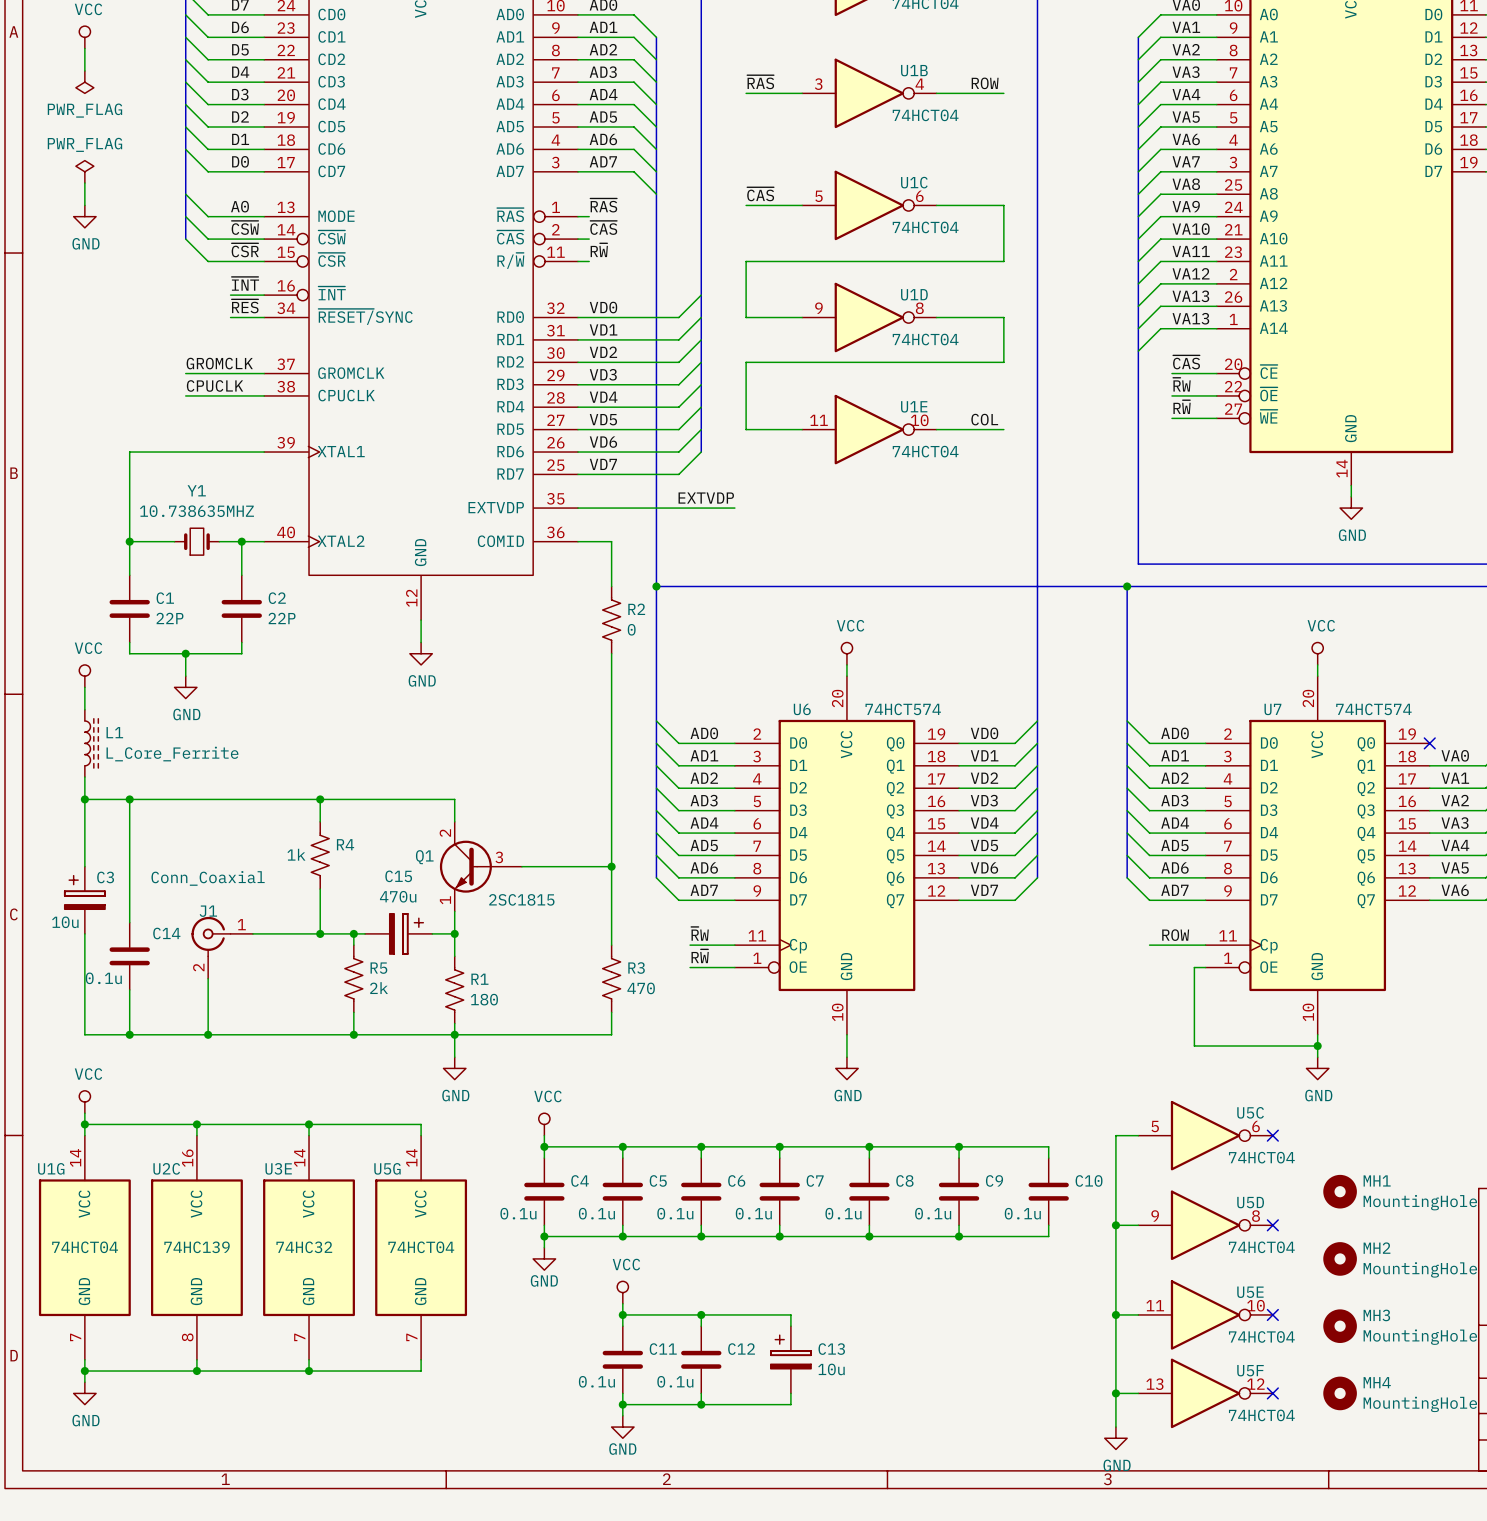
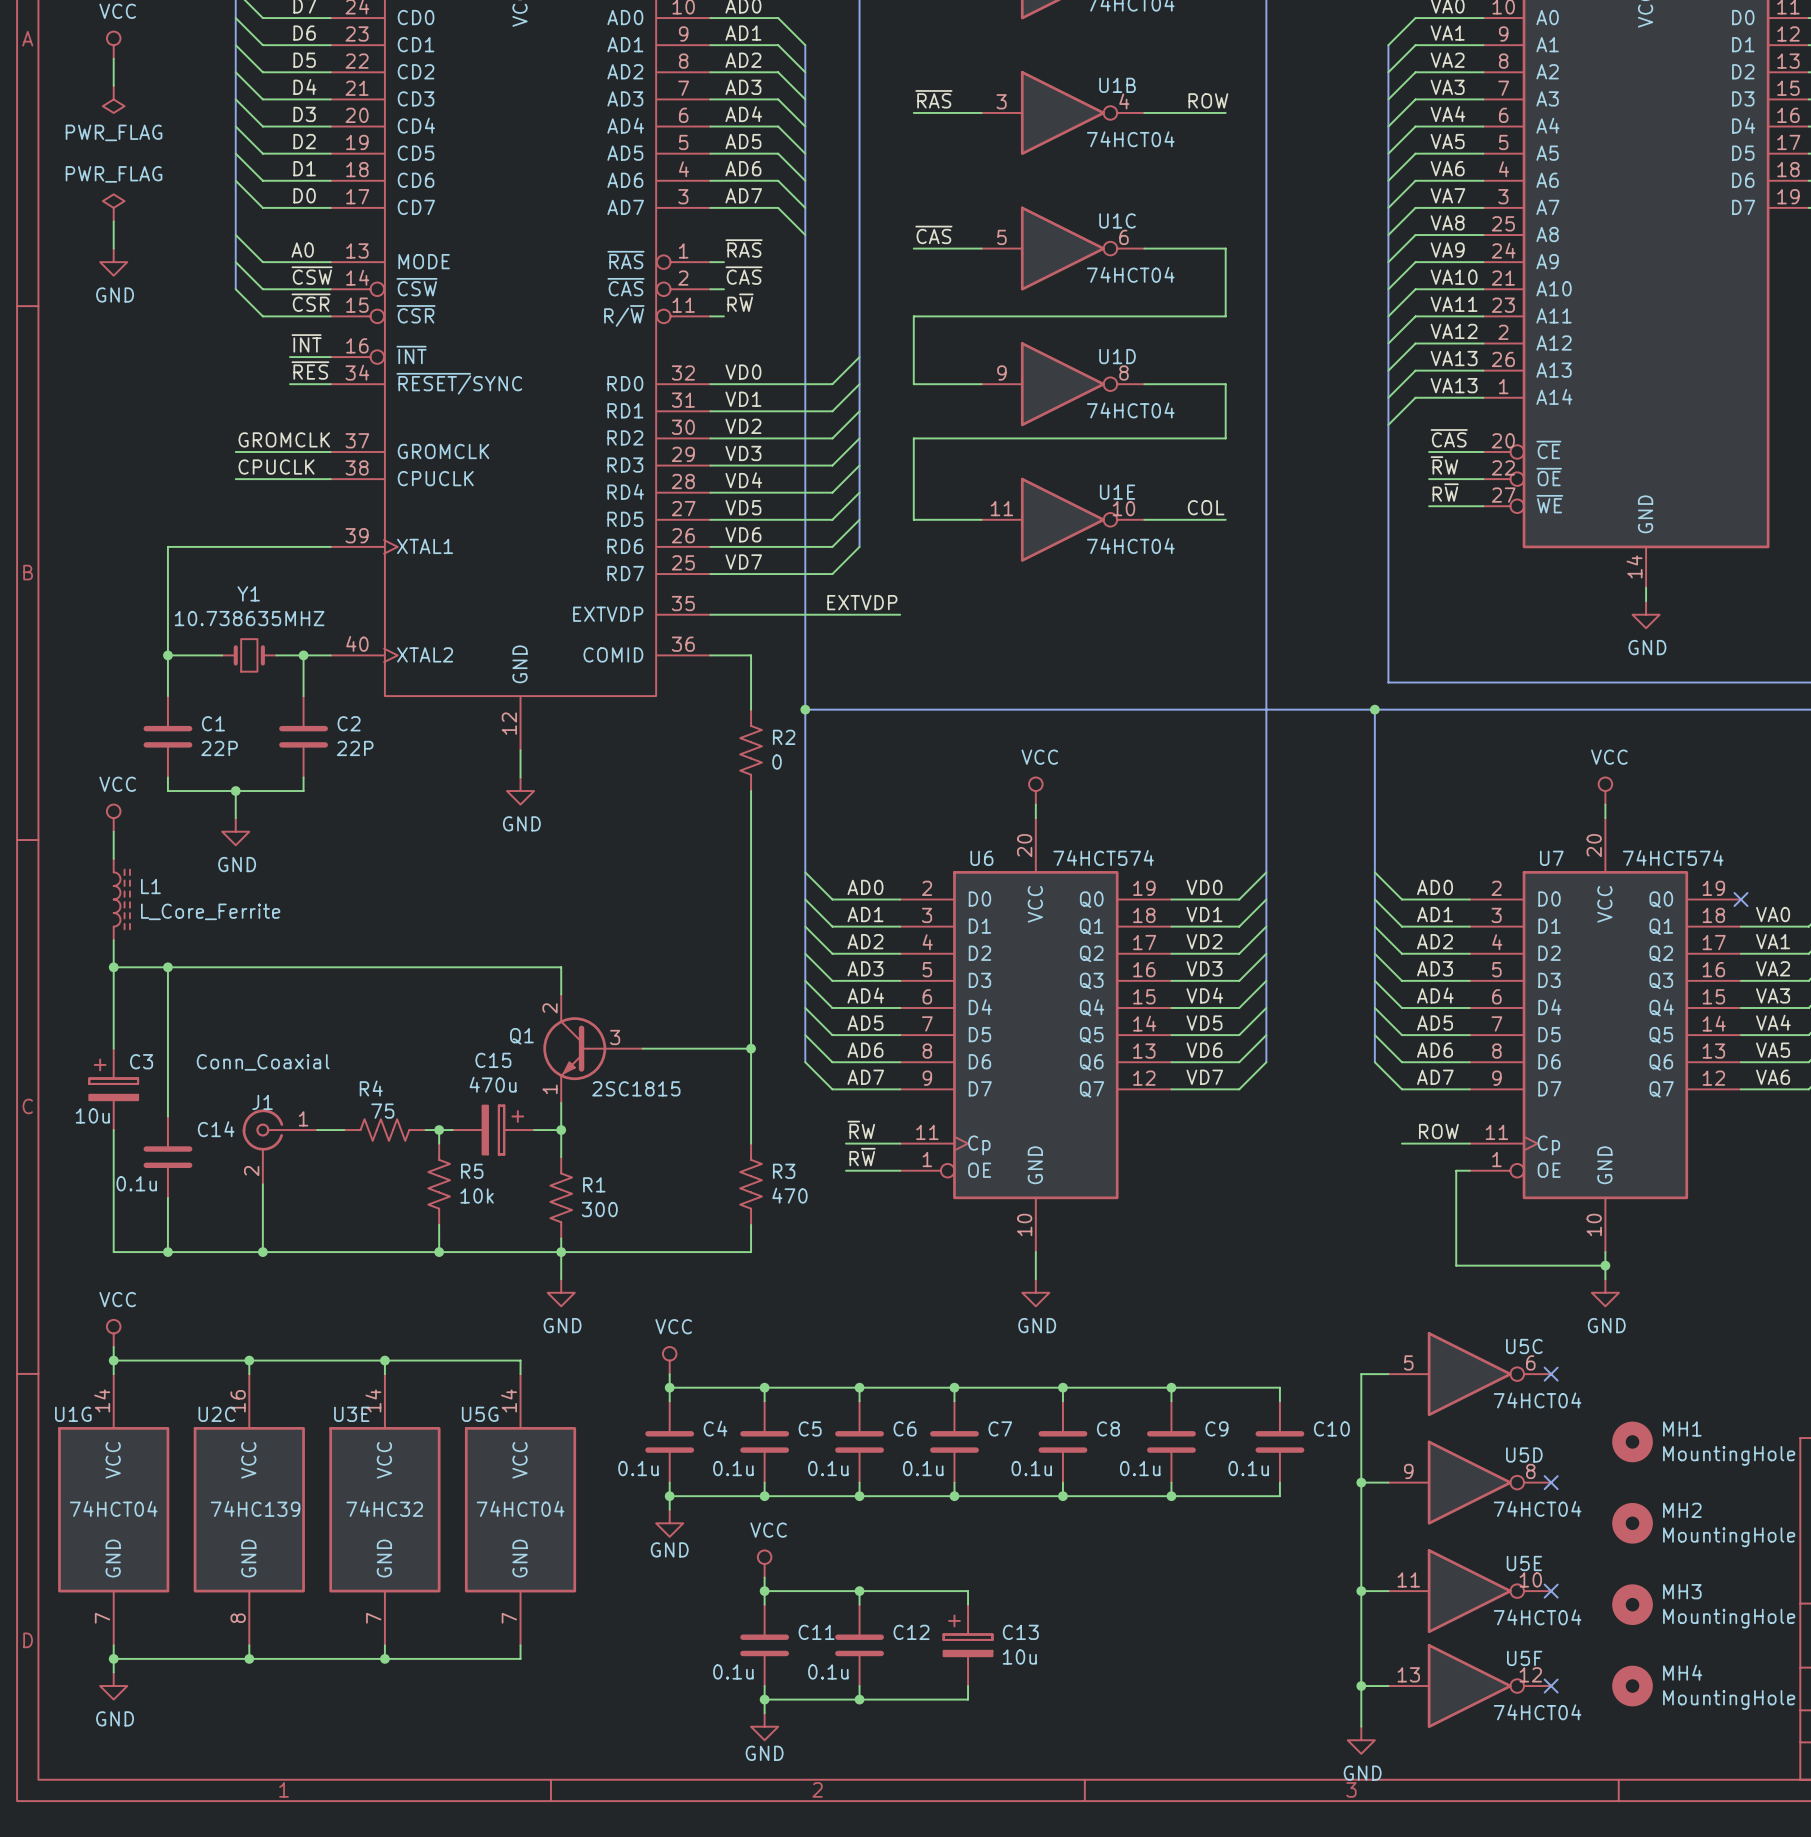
wire: (320, 799) (320, 821) -> none
junction: (320, 799) -> none
R4 name position: R4 (345, 844) -> R4 (371, 1088)
R4 value: 1k (296, 854) -> 75 (382, 1111)
R4 rotation: 0° (320, 855) -> 90° clockwise (384, 1130)
R4 position: (320, 855) -> (384, 1130)
wire: (320, 889) (320, 933) -> none
junction: (320, 933) -> none
R5 value: 2k (379, 988) -> 10k (477, 1195)
R1 value: 180 (484, 999) -> 300 (599, 1209)

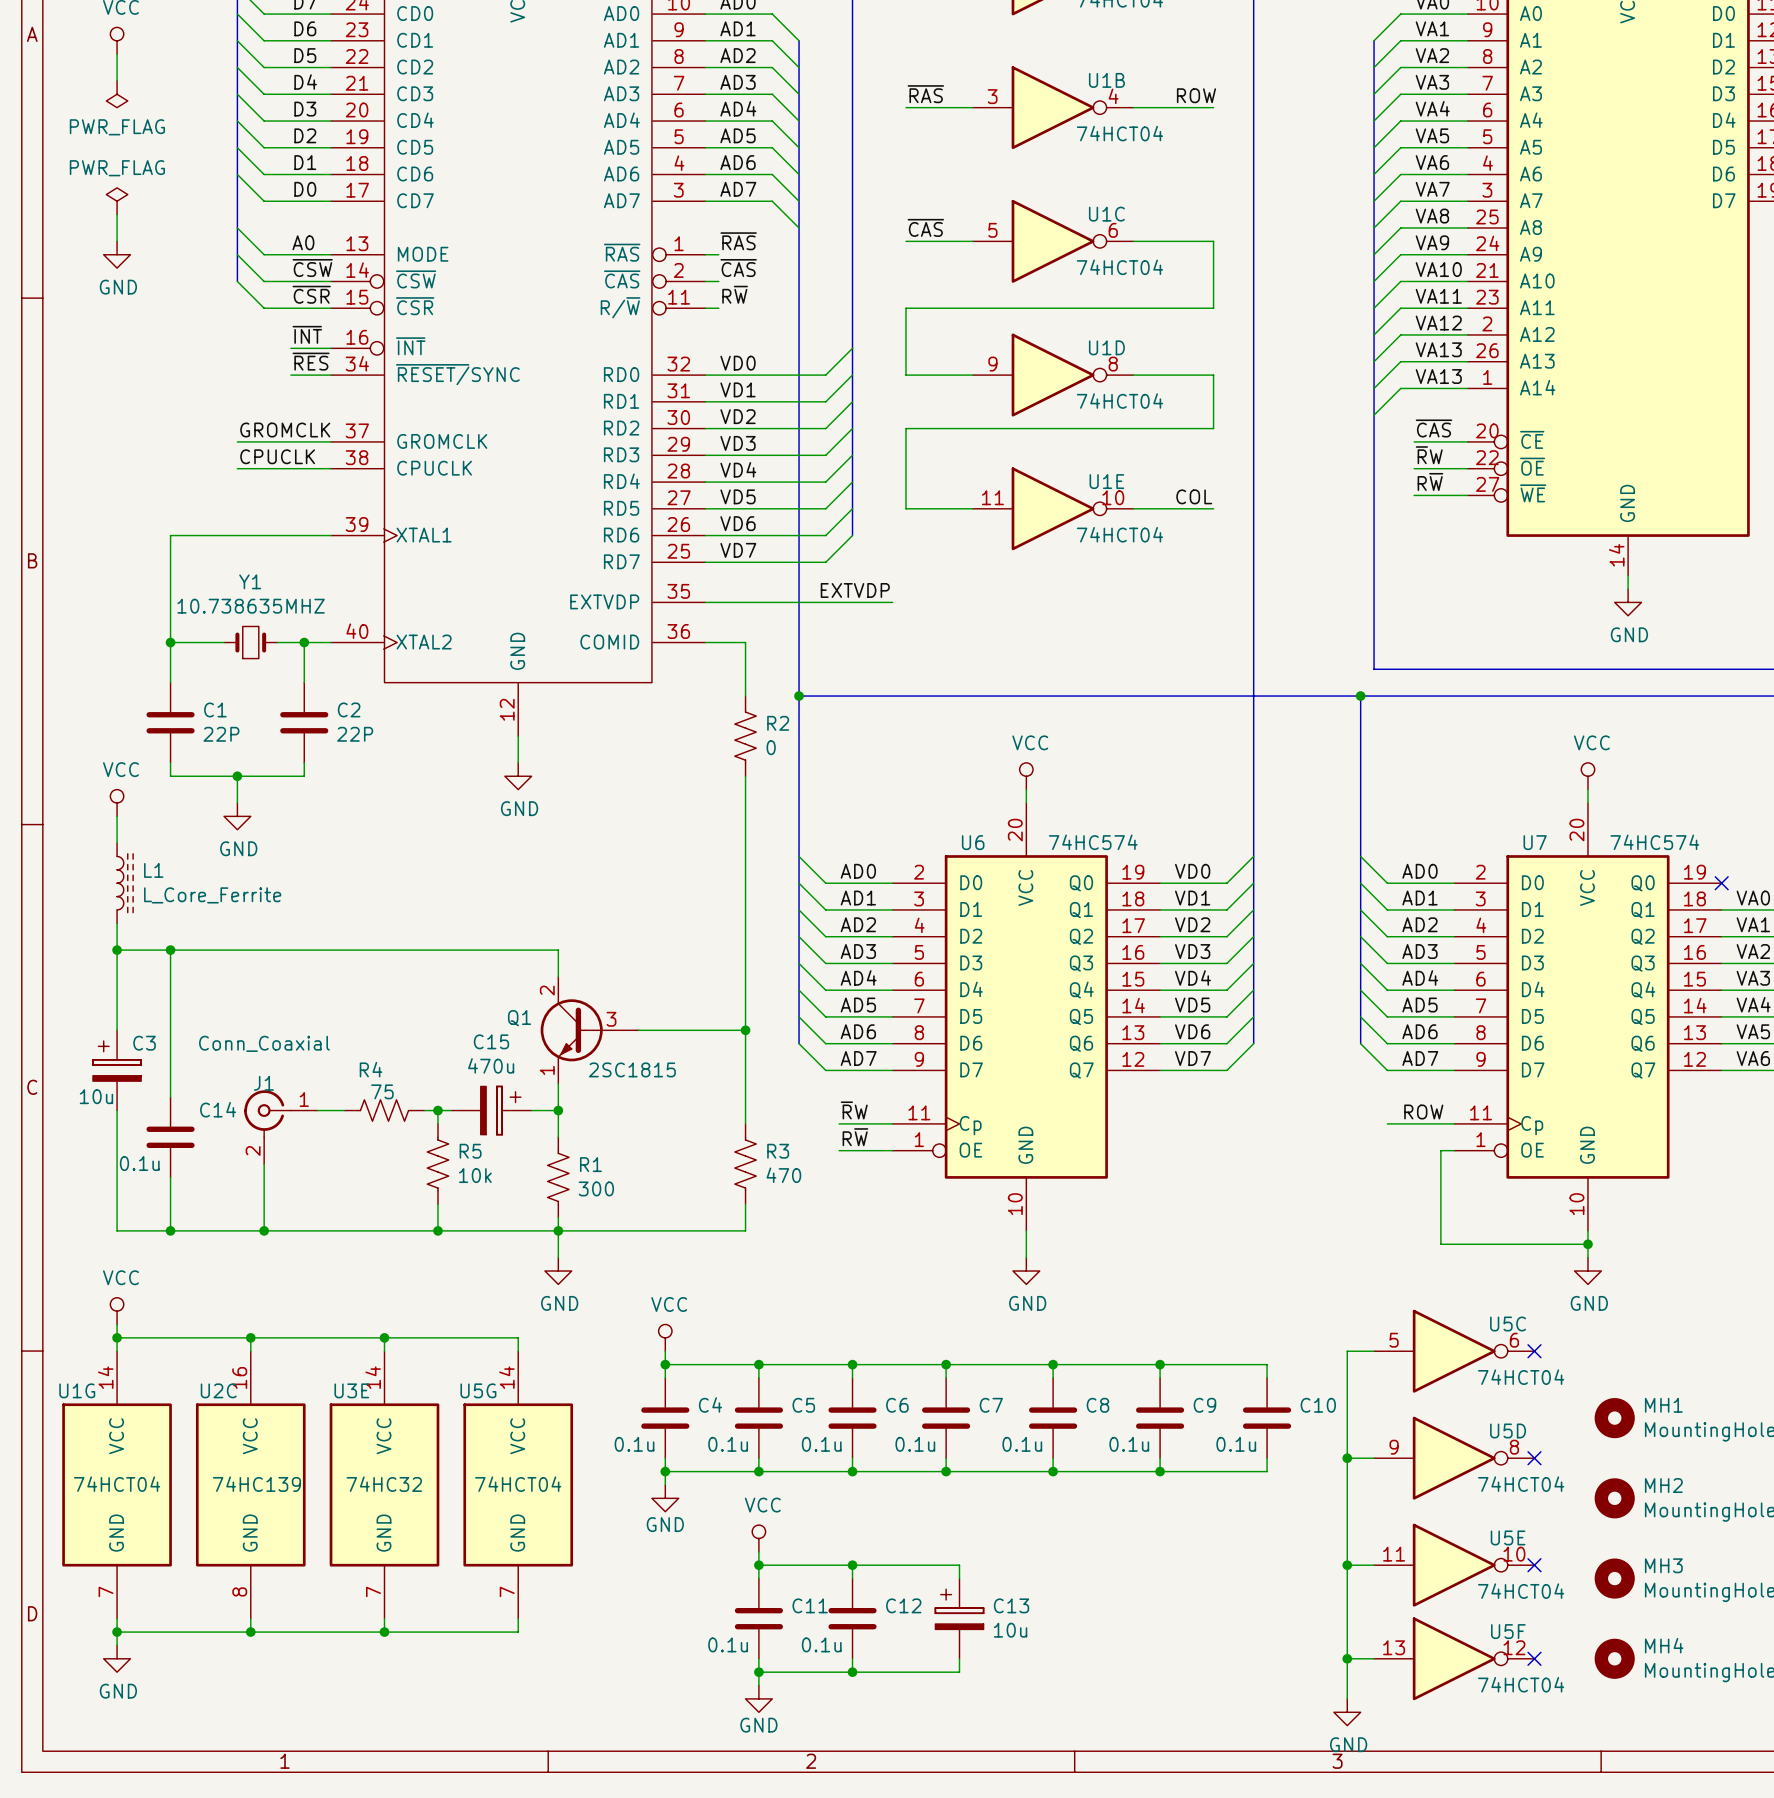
U6 value: 74HCT574 (1103, 857) -> 74HC574 (1093, 842)
U7 value: 74HCT574 (1673, 857) -> 74HC574 (1654, 842)

